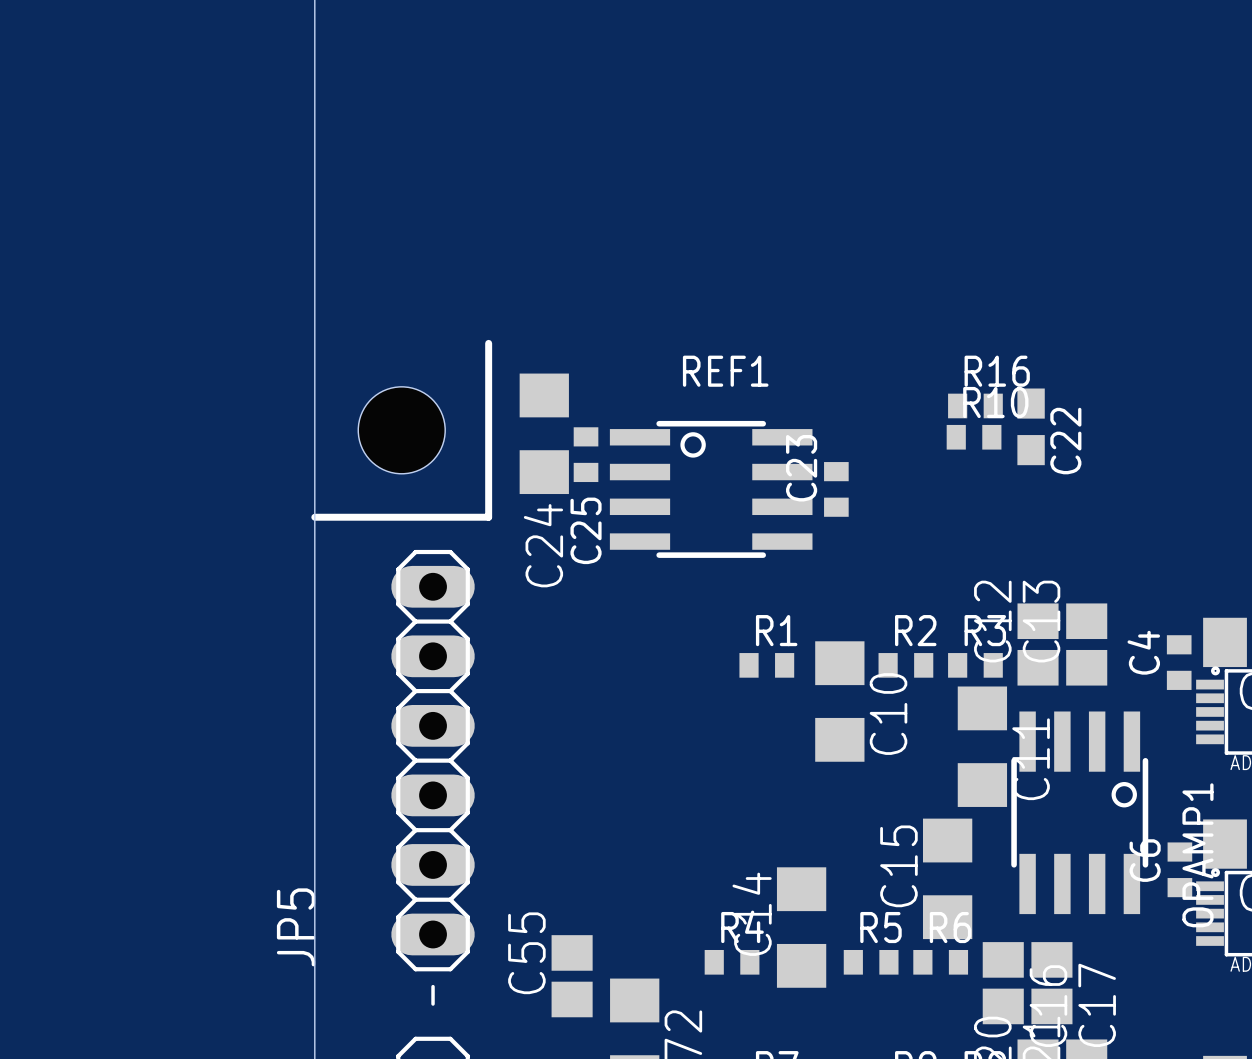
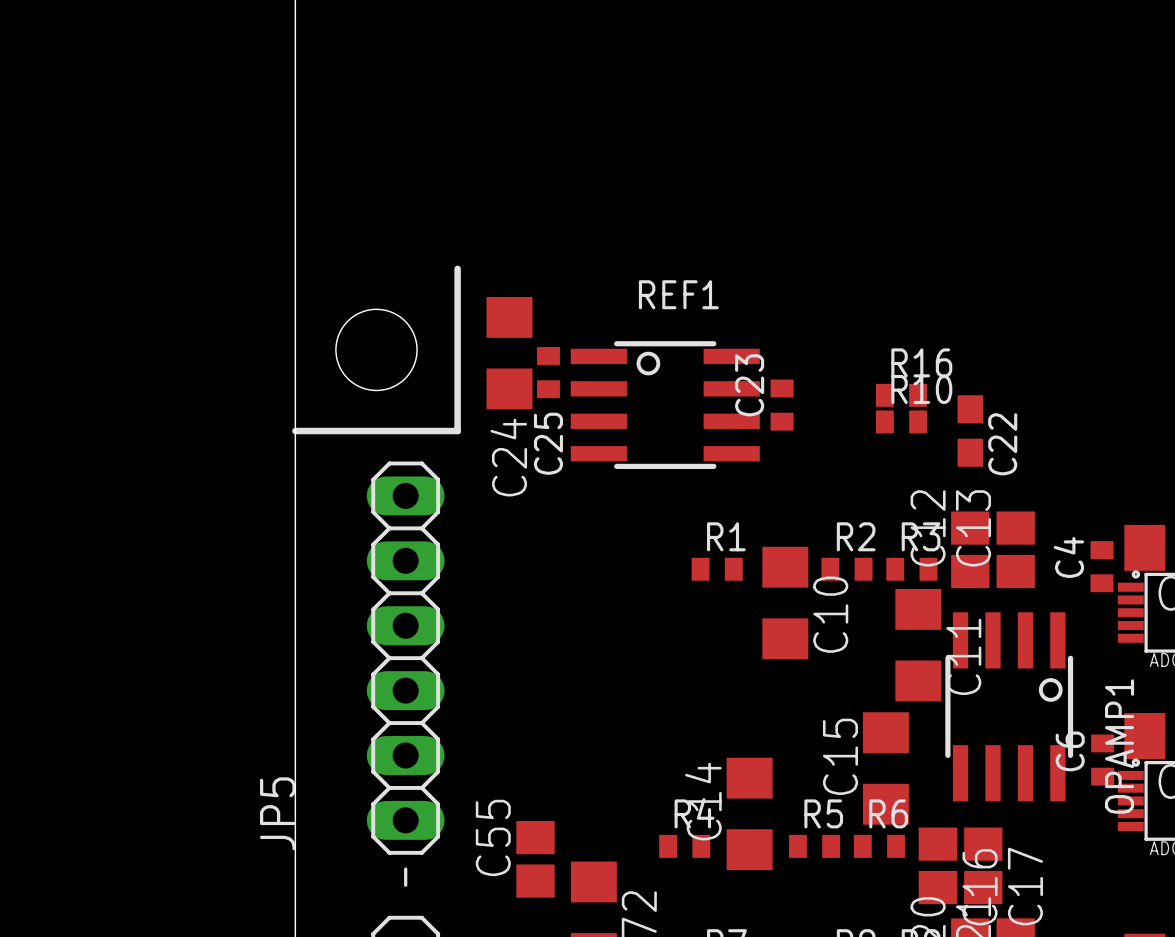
R16 position: (975, 405) -> (901, 395)
C22 position: (1031, 426) -> (970, 431)
R10 position: (974, 437) -> (901, 421)

